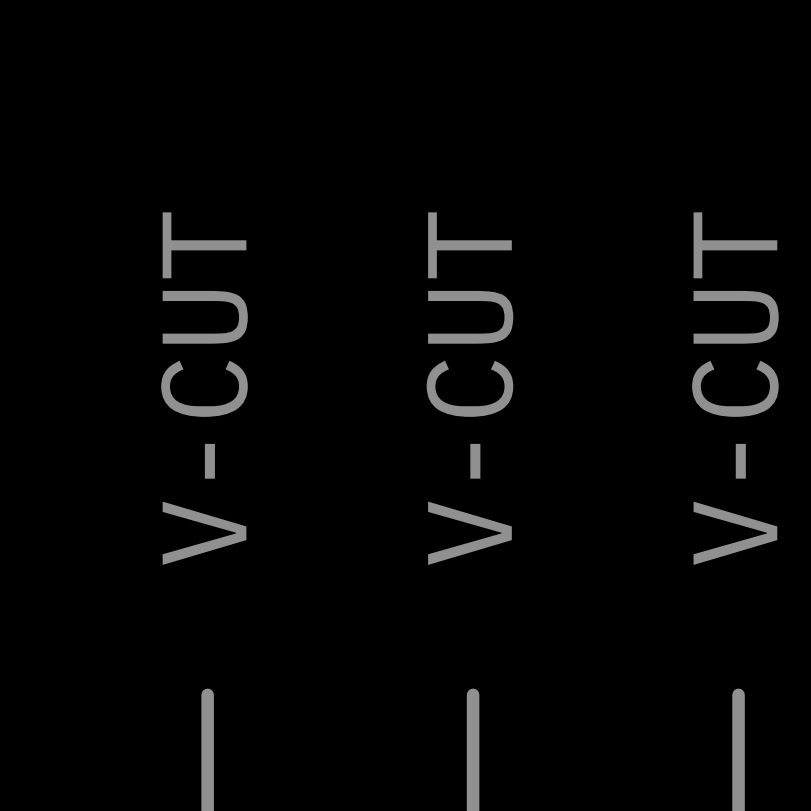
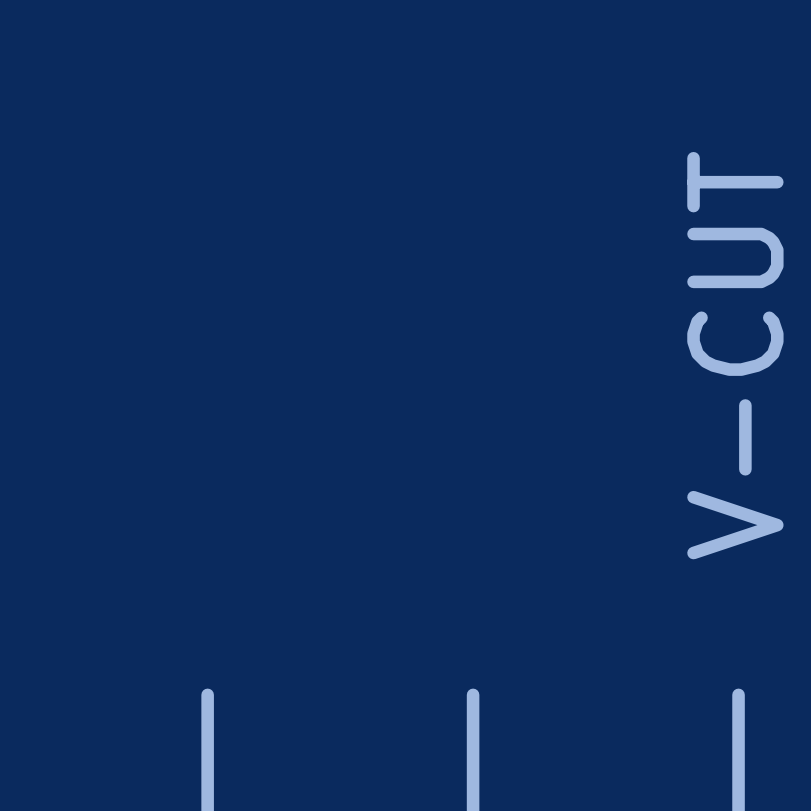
text: V-CUT (204, 388) -> none
text: V-CUT (469, 388) -> none

